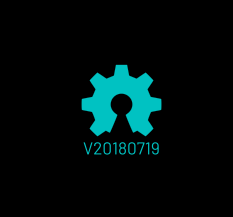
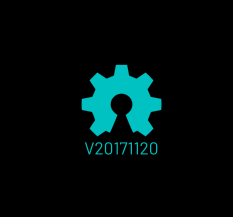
drawing shape: [83, 142, 159, 155] -> [84, 142, 158, 155]

